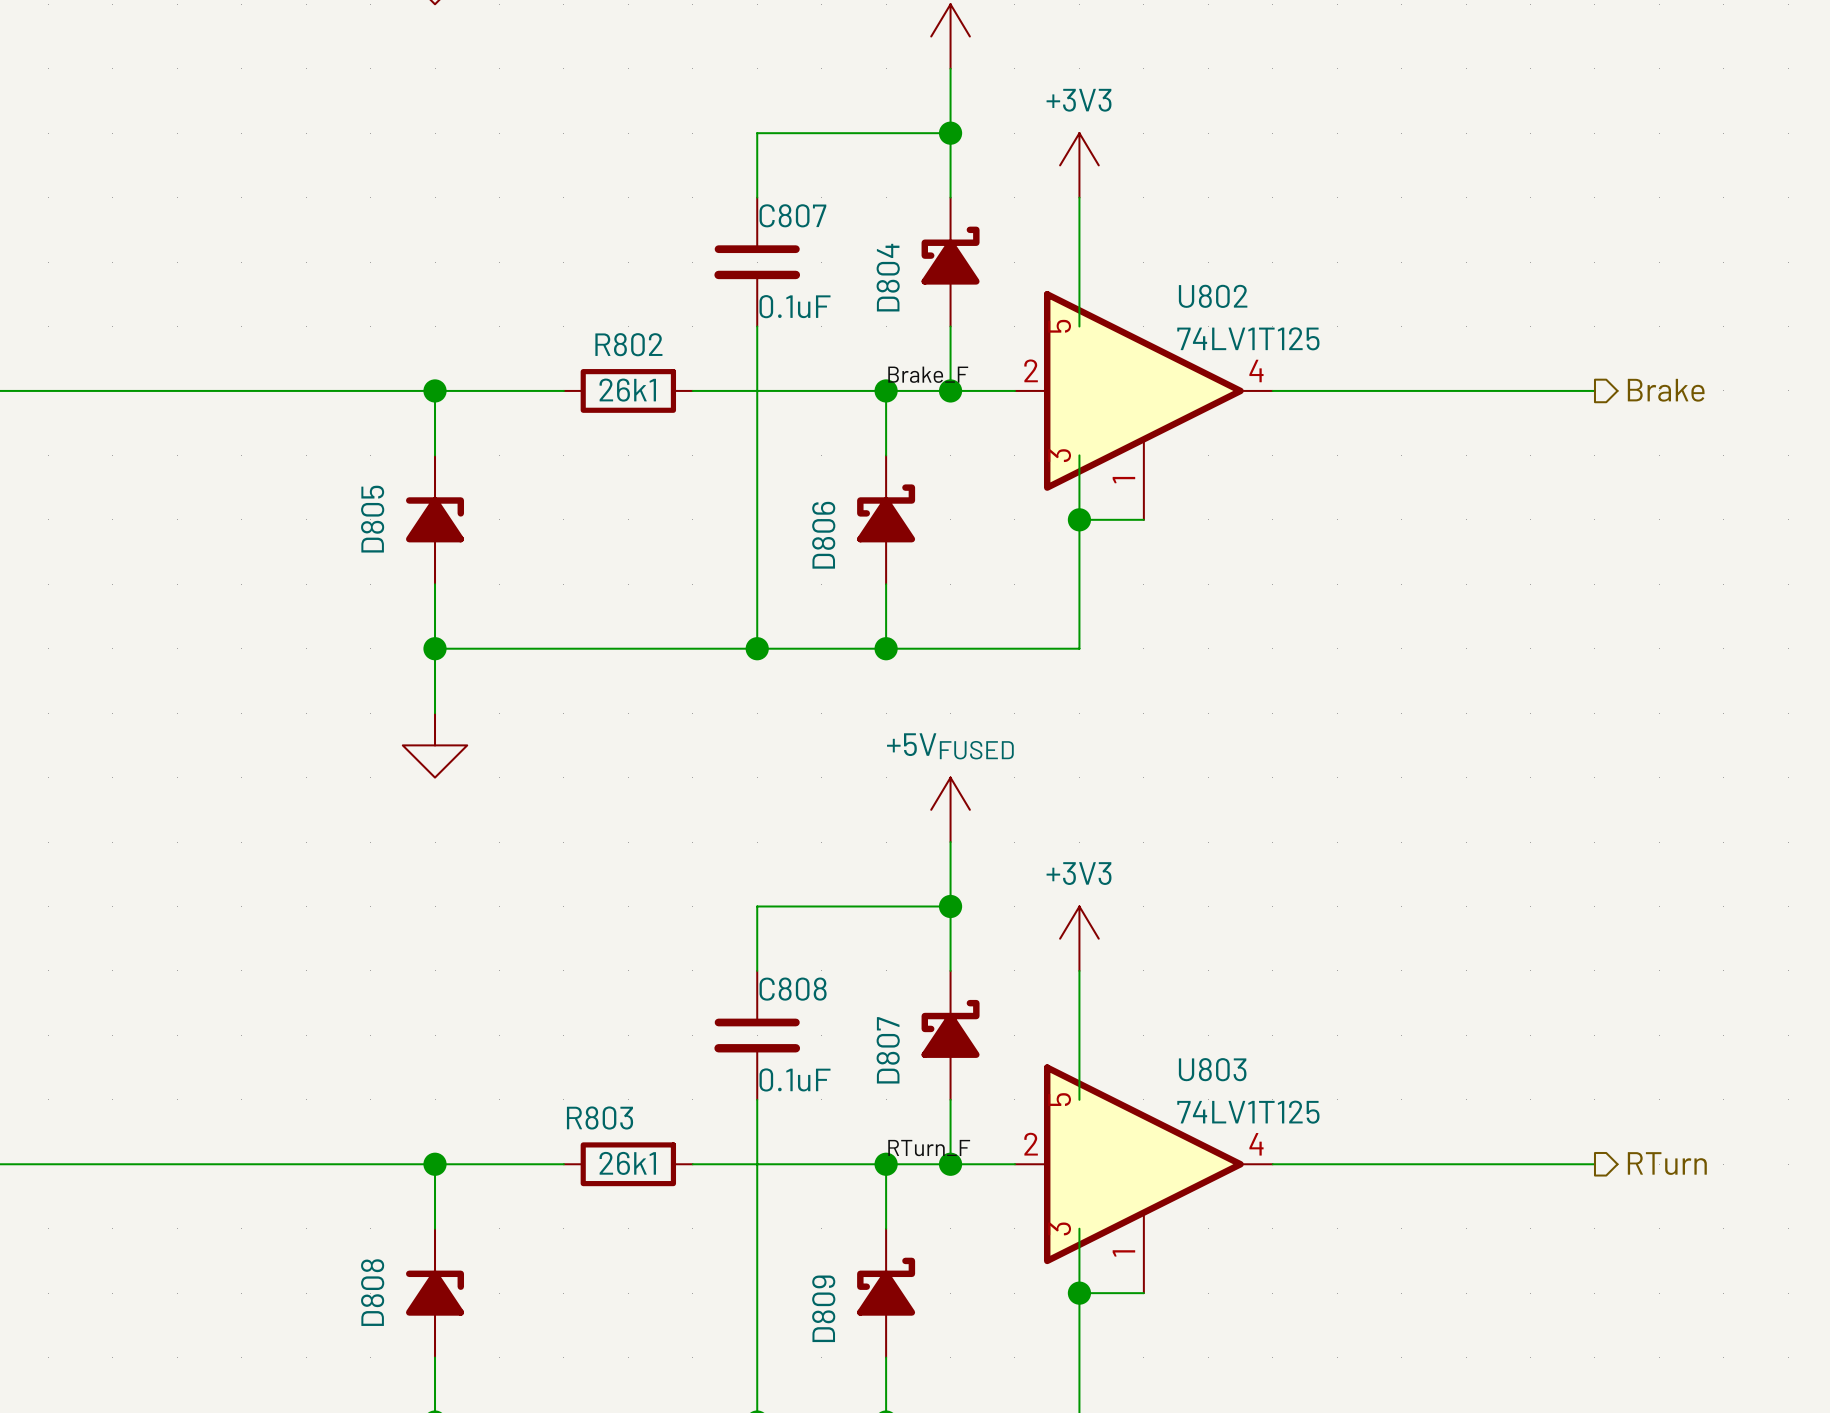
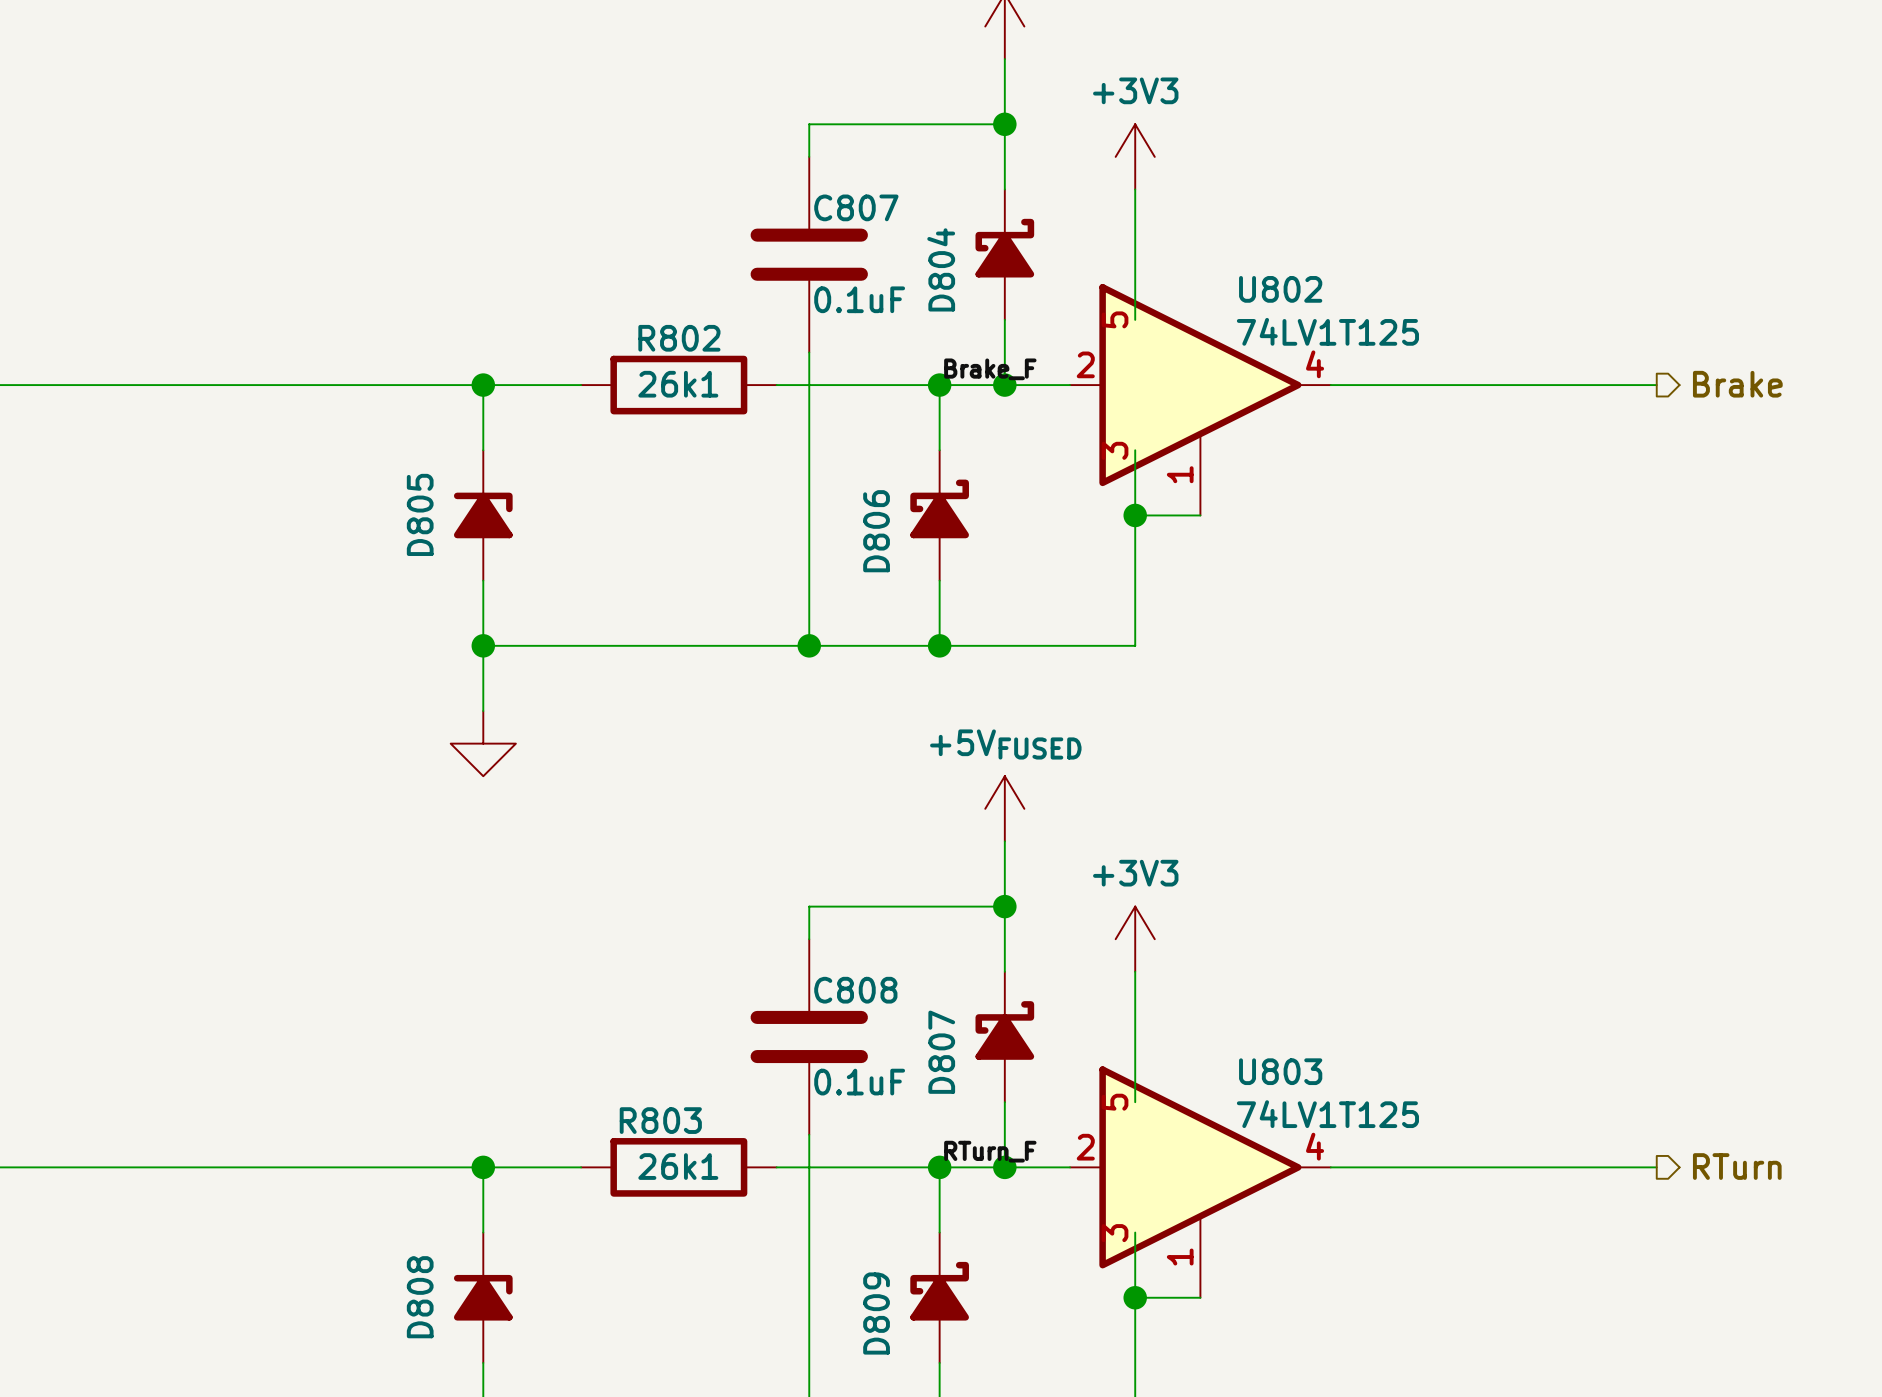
C807 symbol: [714, 197, 801, 327] -> [750, 156, 868, 353]
R802 symbol: [563, 369, 693, 413] -> [581, 355, 777, 415]
C808 symbol: [714, 970, 801, 1100] -> [750, 939, 868, 1135]
R803 symbol: [563, 1142, 693, 1187] -> [581, 1138, 777, 1197]

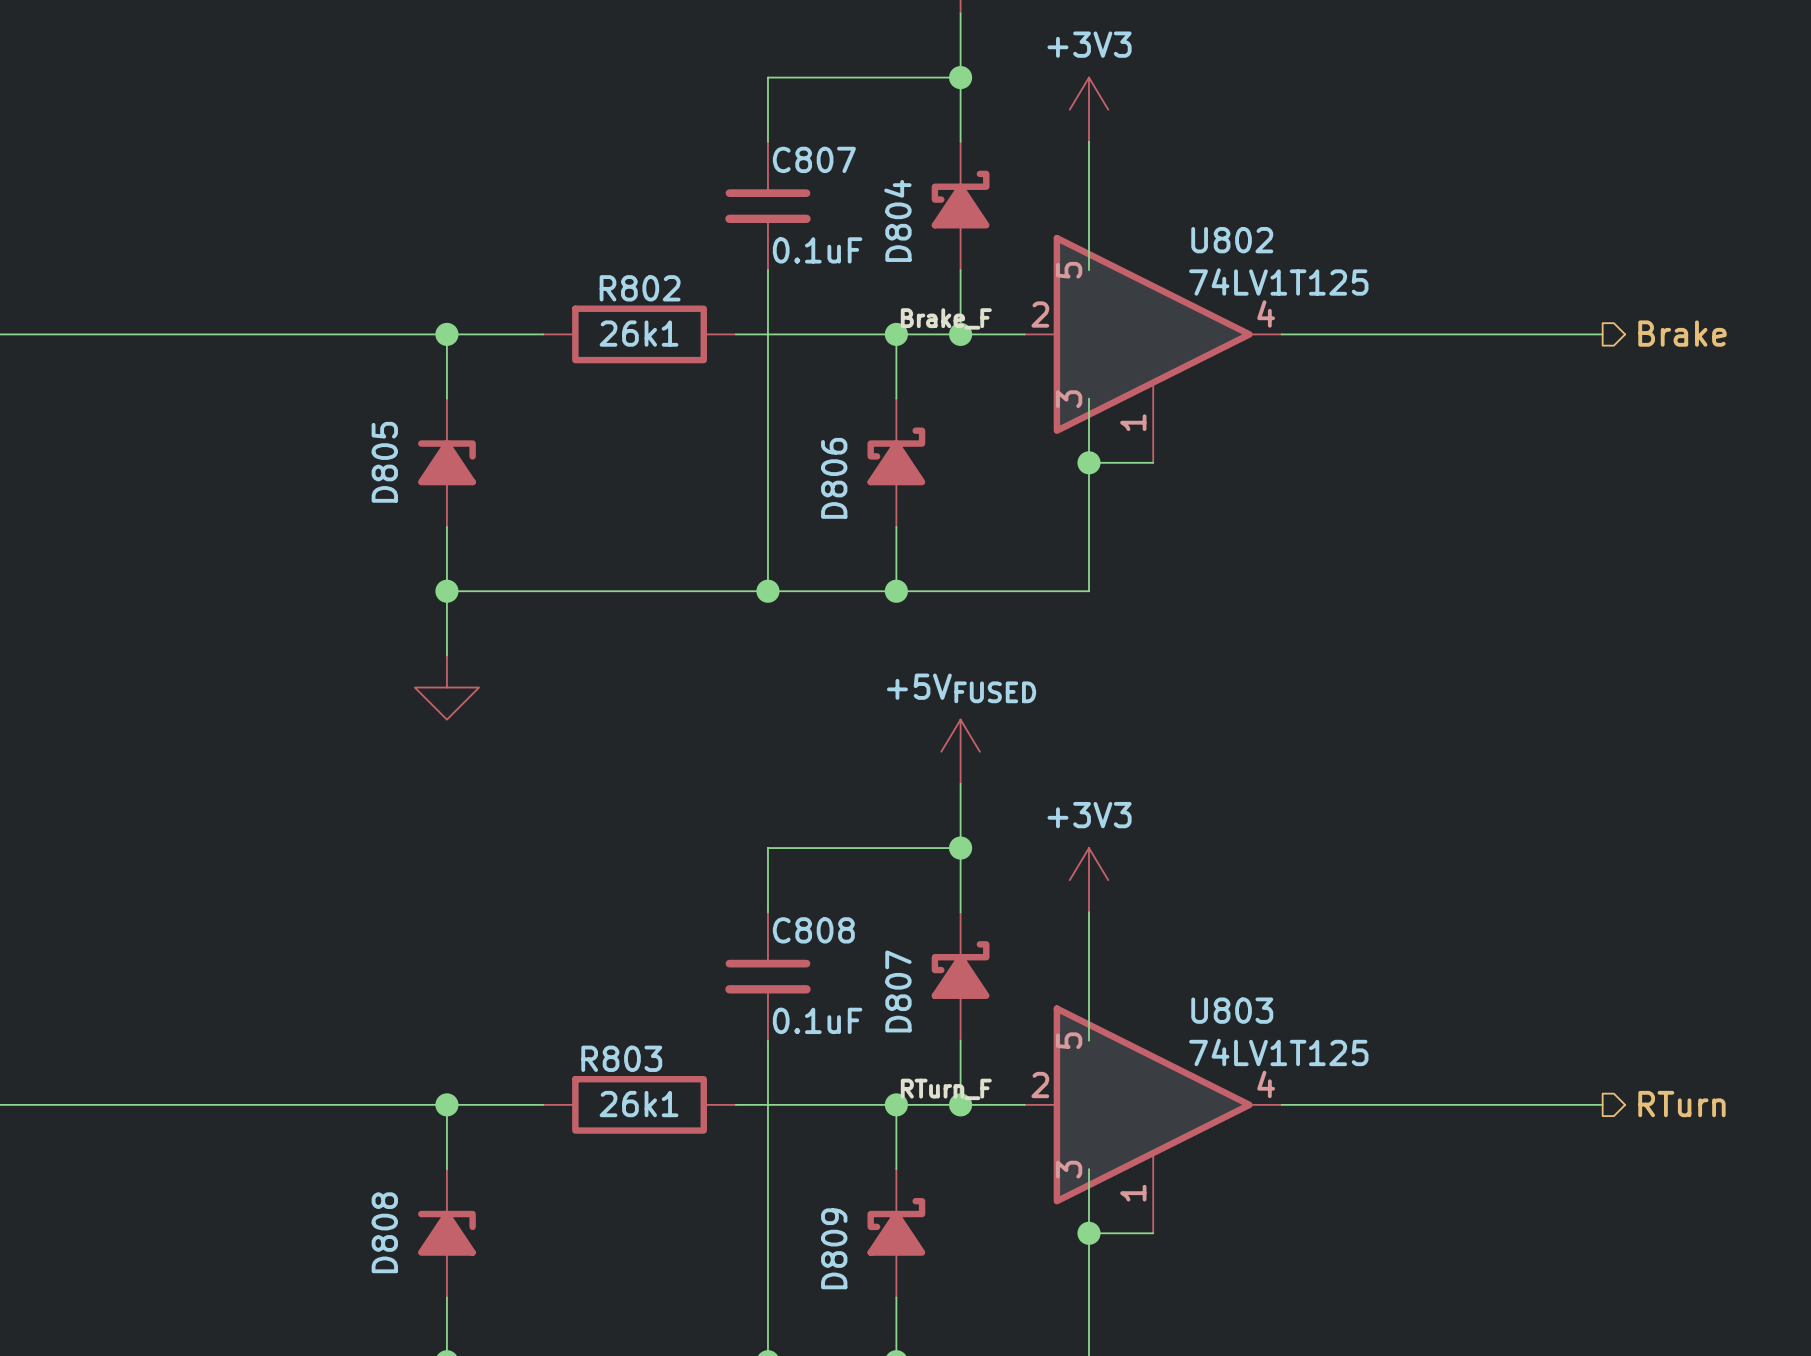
C807 symbol: [750, 156, 868, 353] -> [725, 141, 811, 271]
C808 symbol: [750, 939, 868, 1135] -> [725, 912, 811, 1041]

